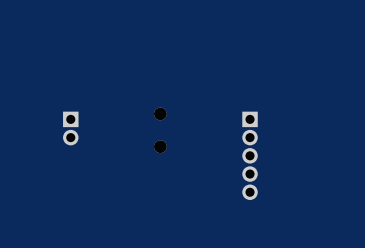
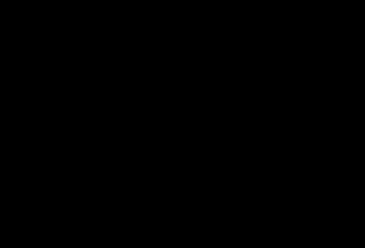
part: (70, 128) -> none
part: (160, 130) -> none
part: (250, 155) -> none

